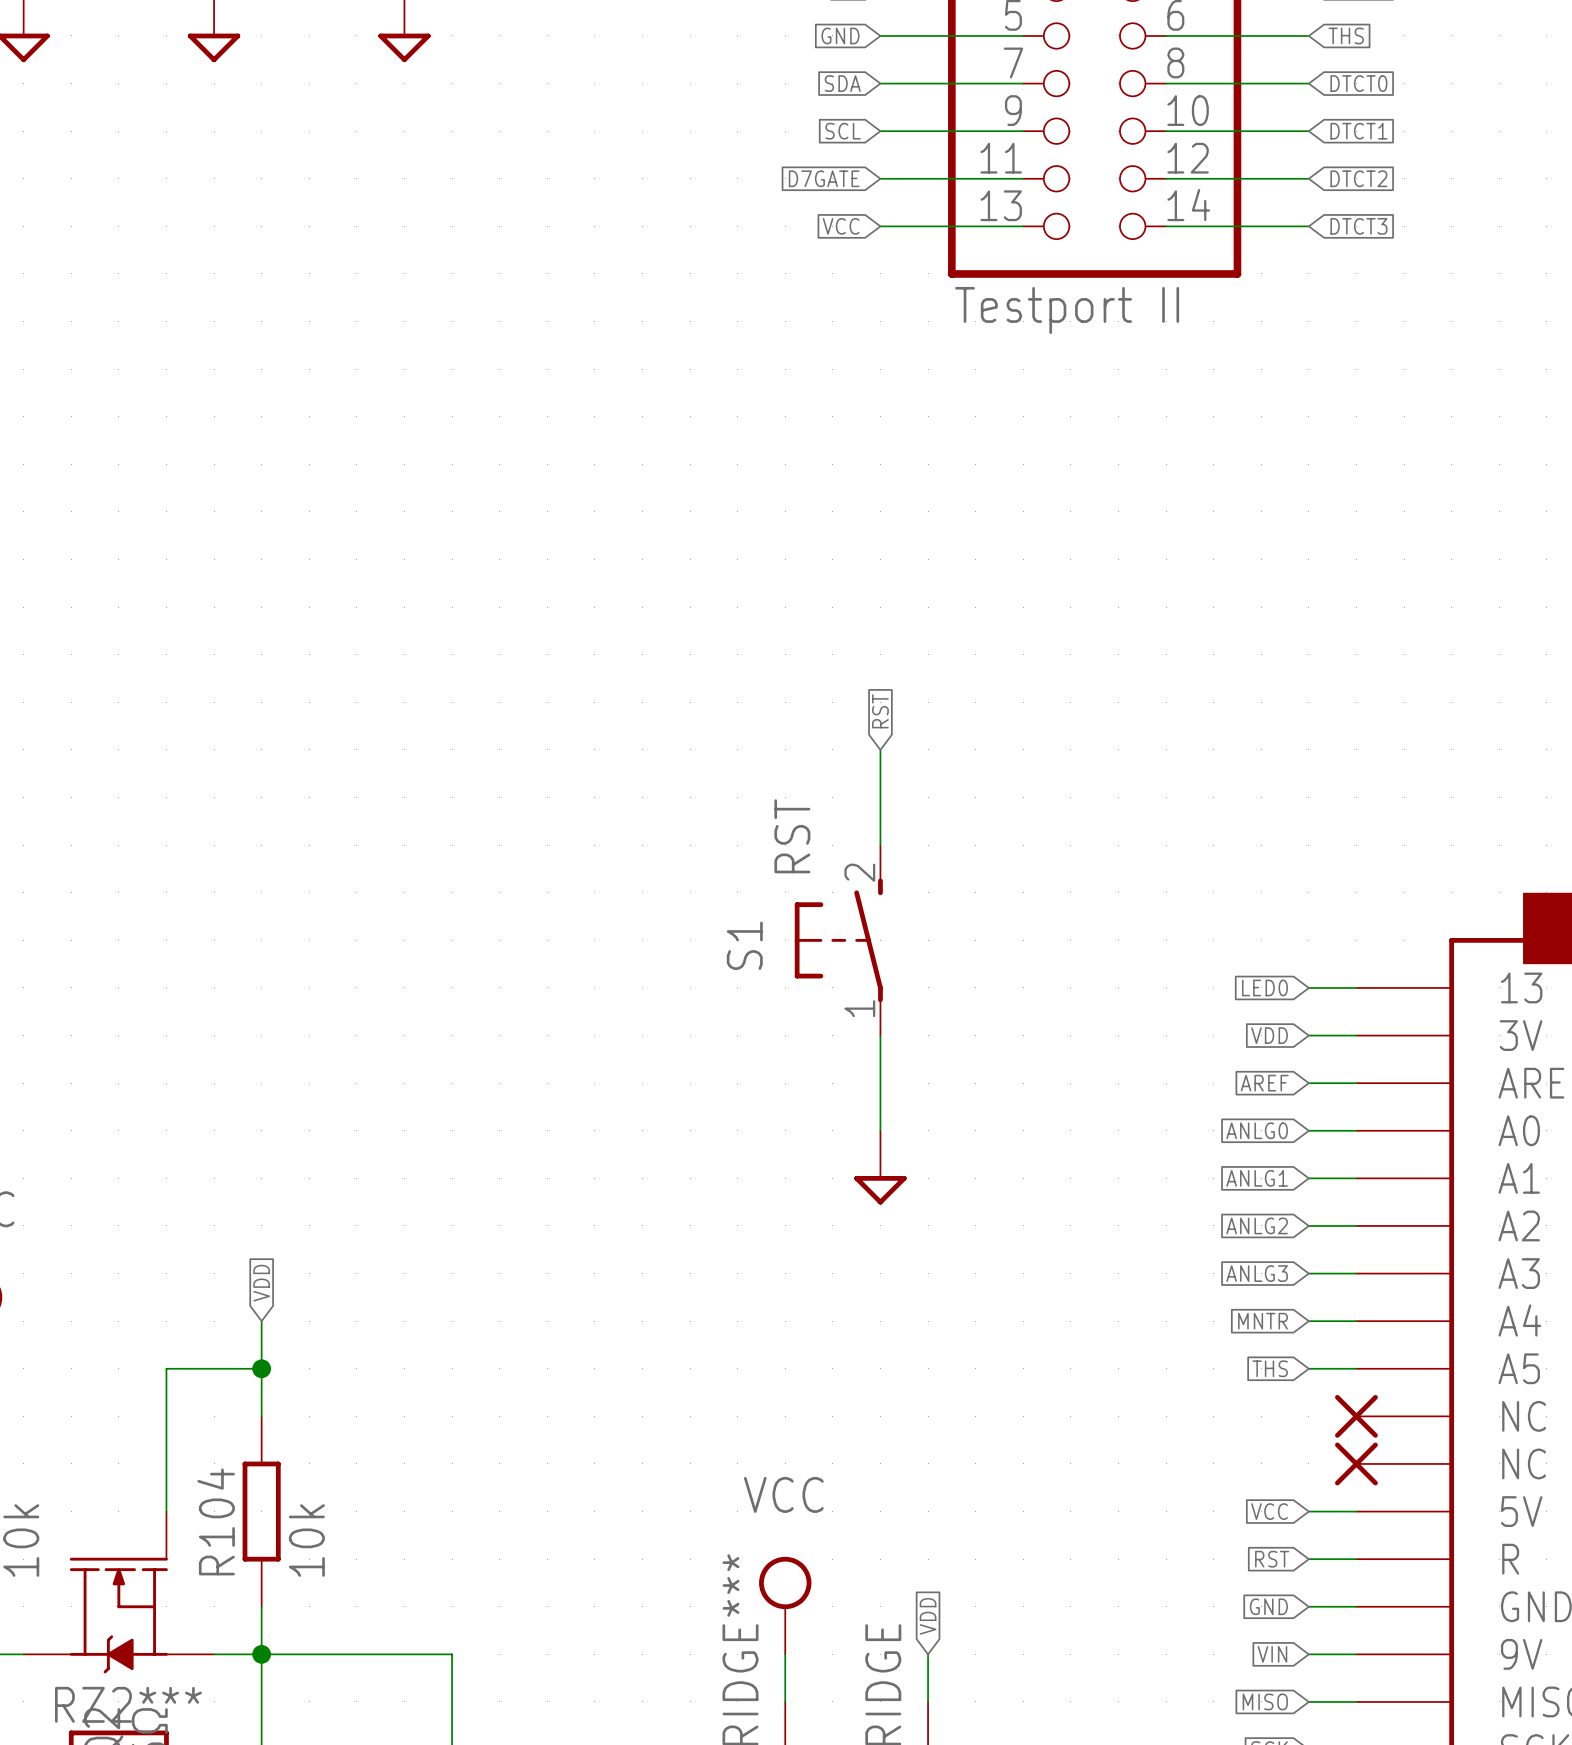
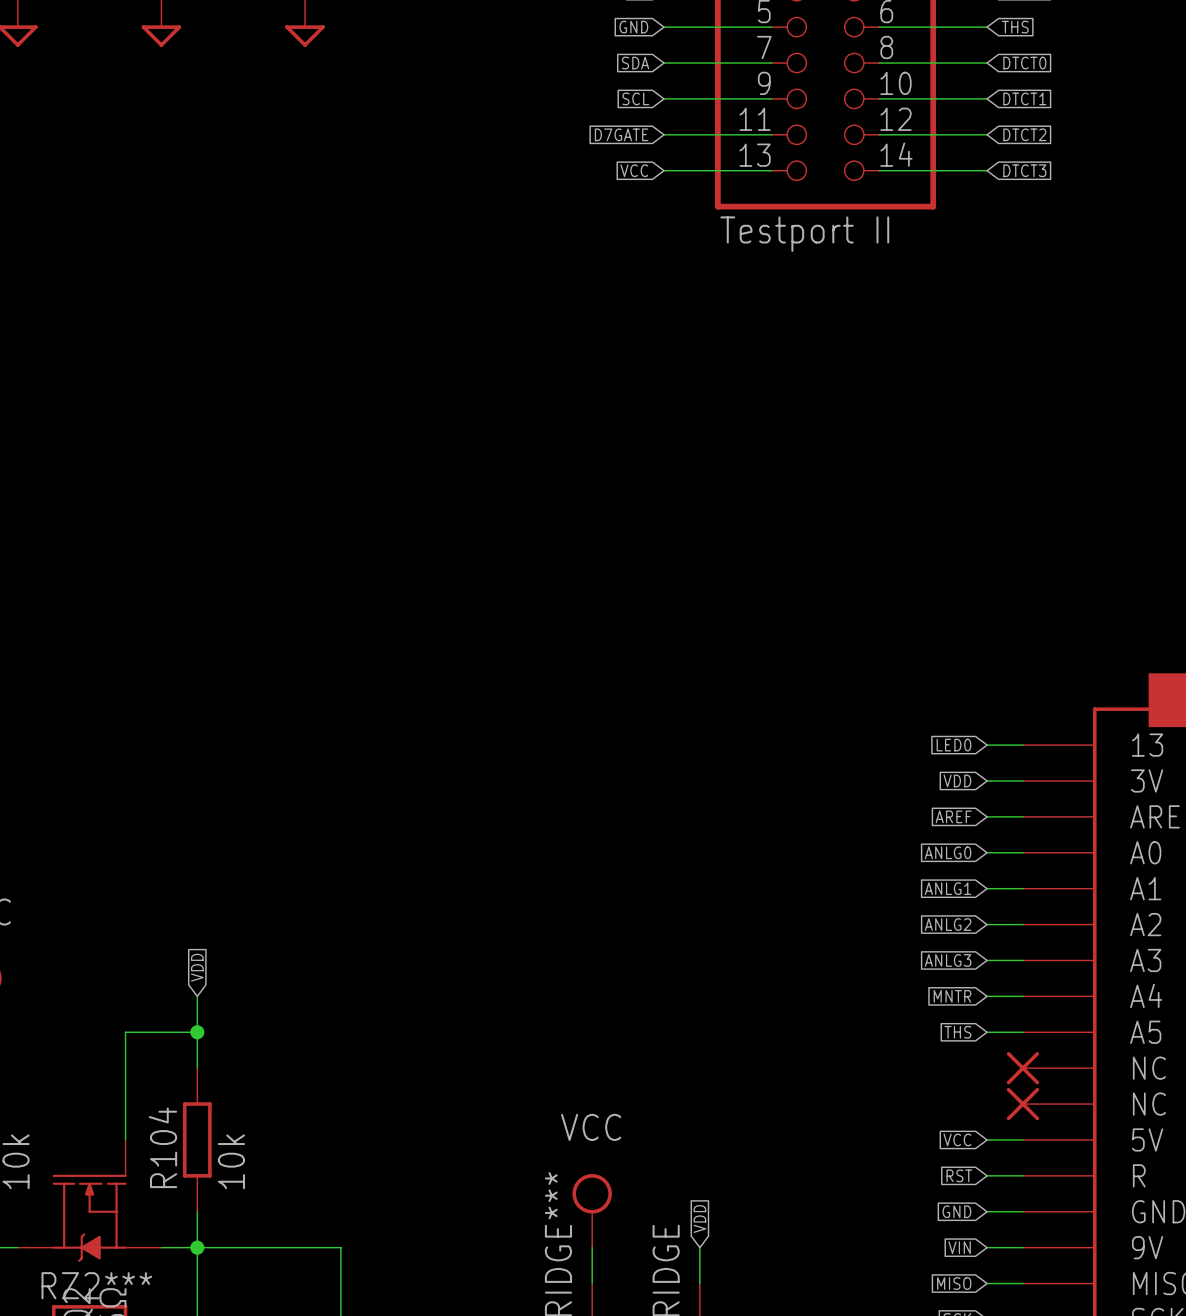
global label: RST (880, 711) -> none
wire: (880, 749) (880, 845) -> none
S1: RST (838, 940) -> none
wire: (880, 1035) (880, 1130) -> none
power symbol: (880, 1167) -> none

